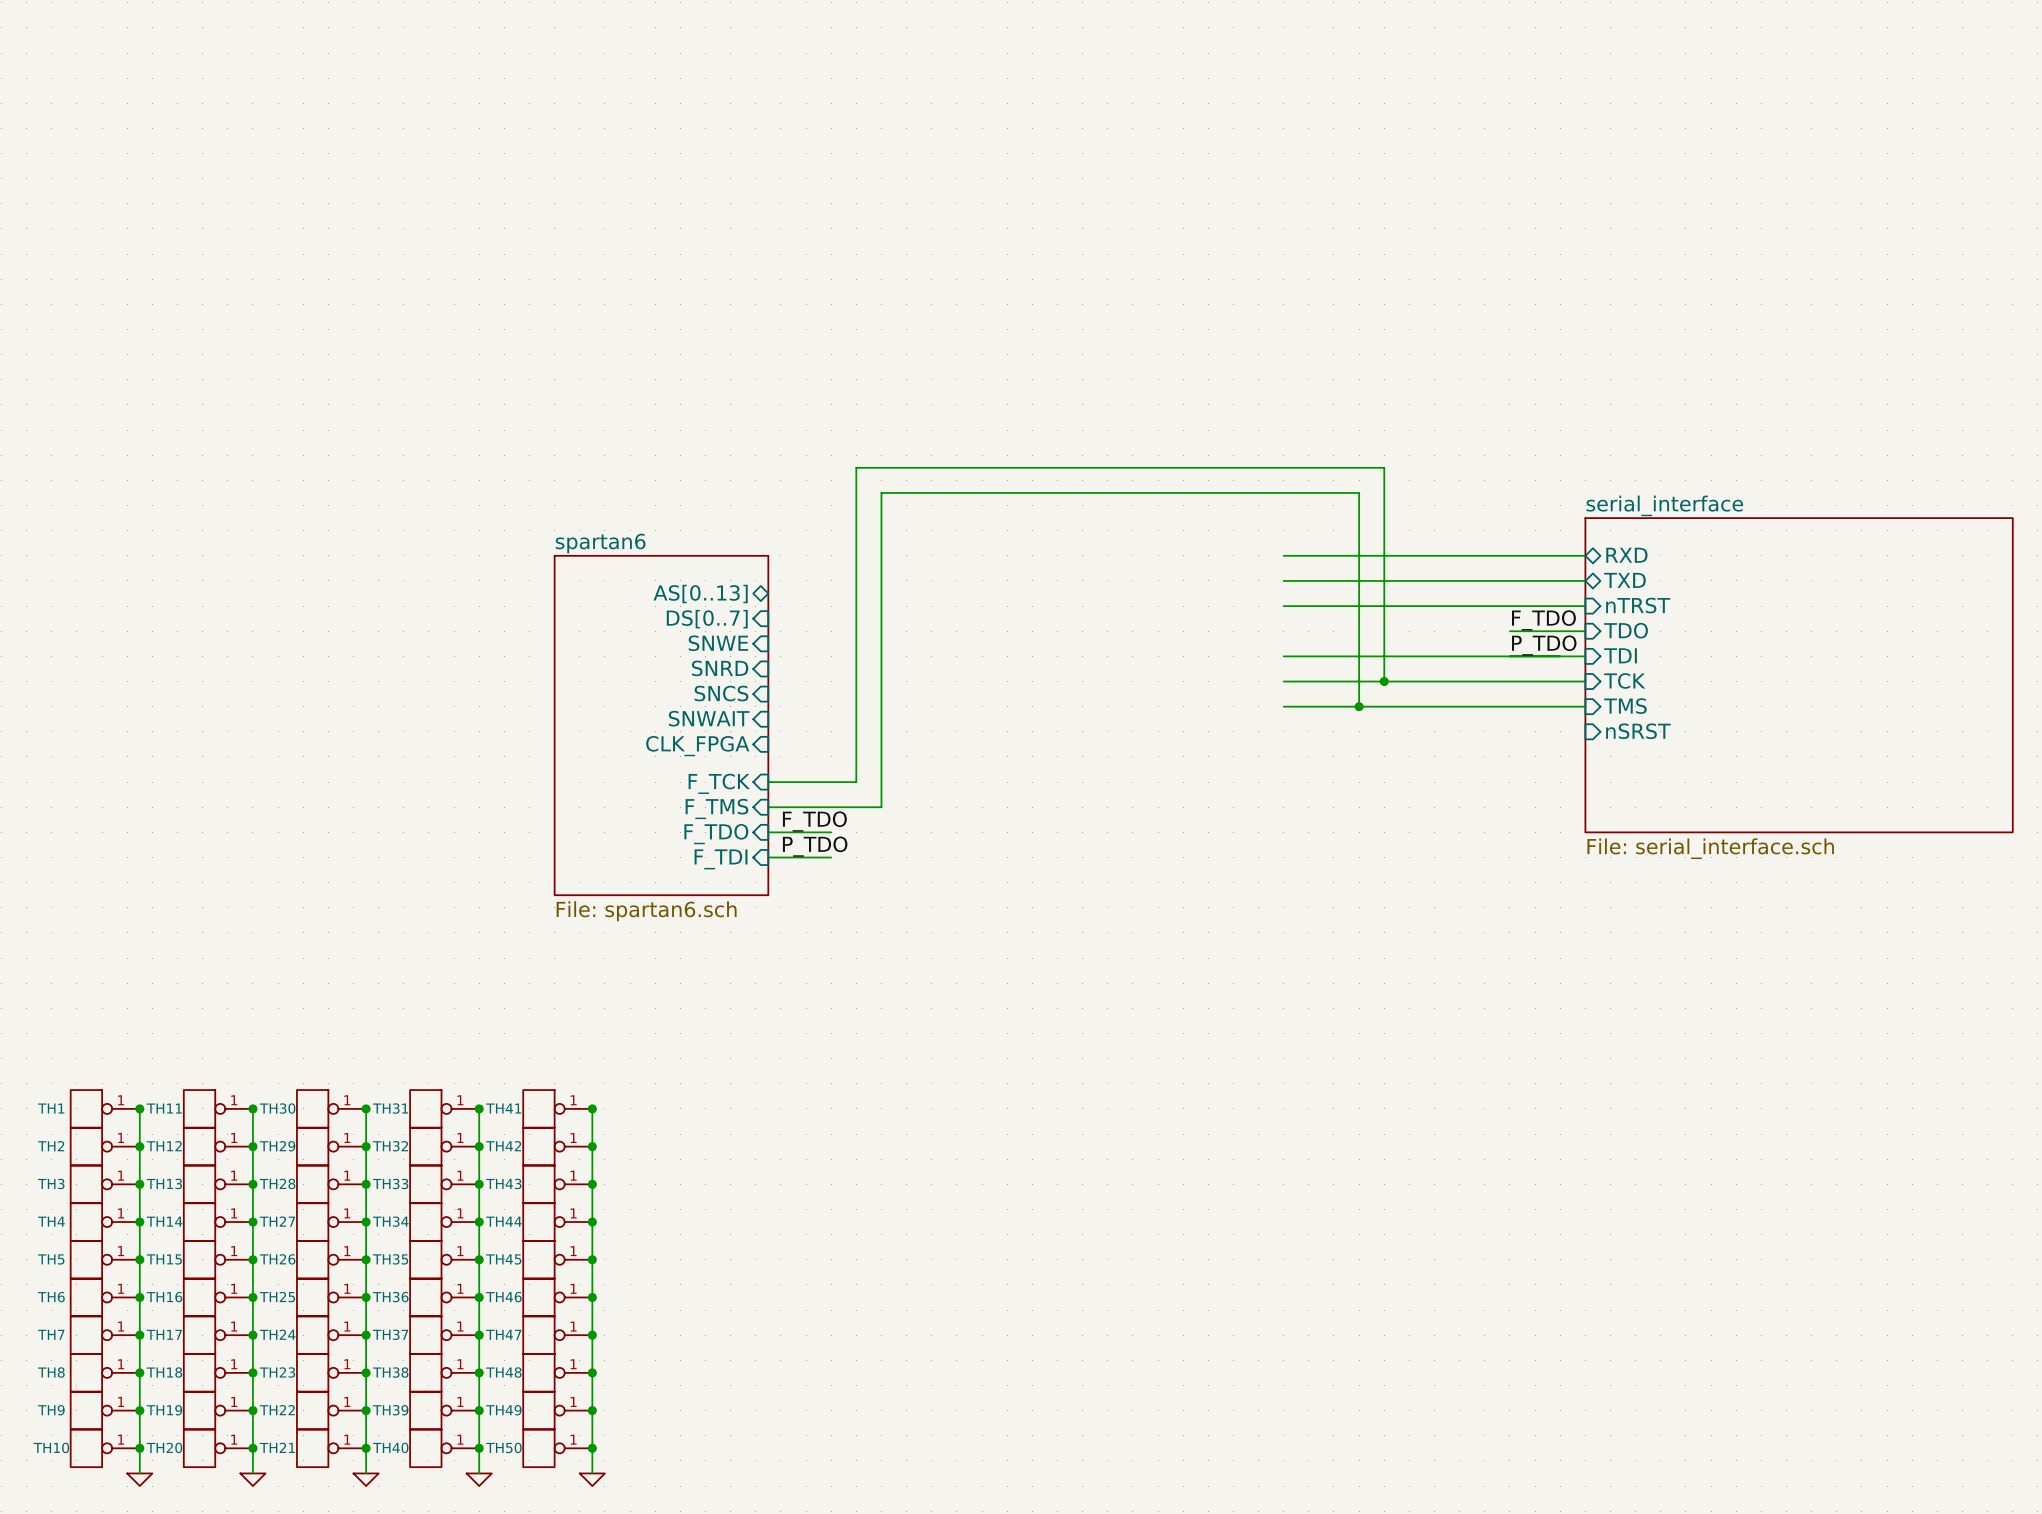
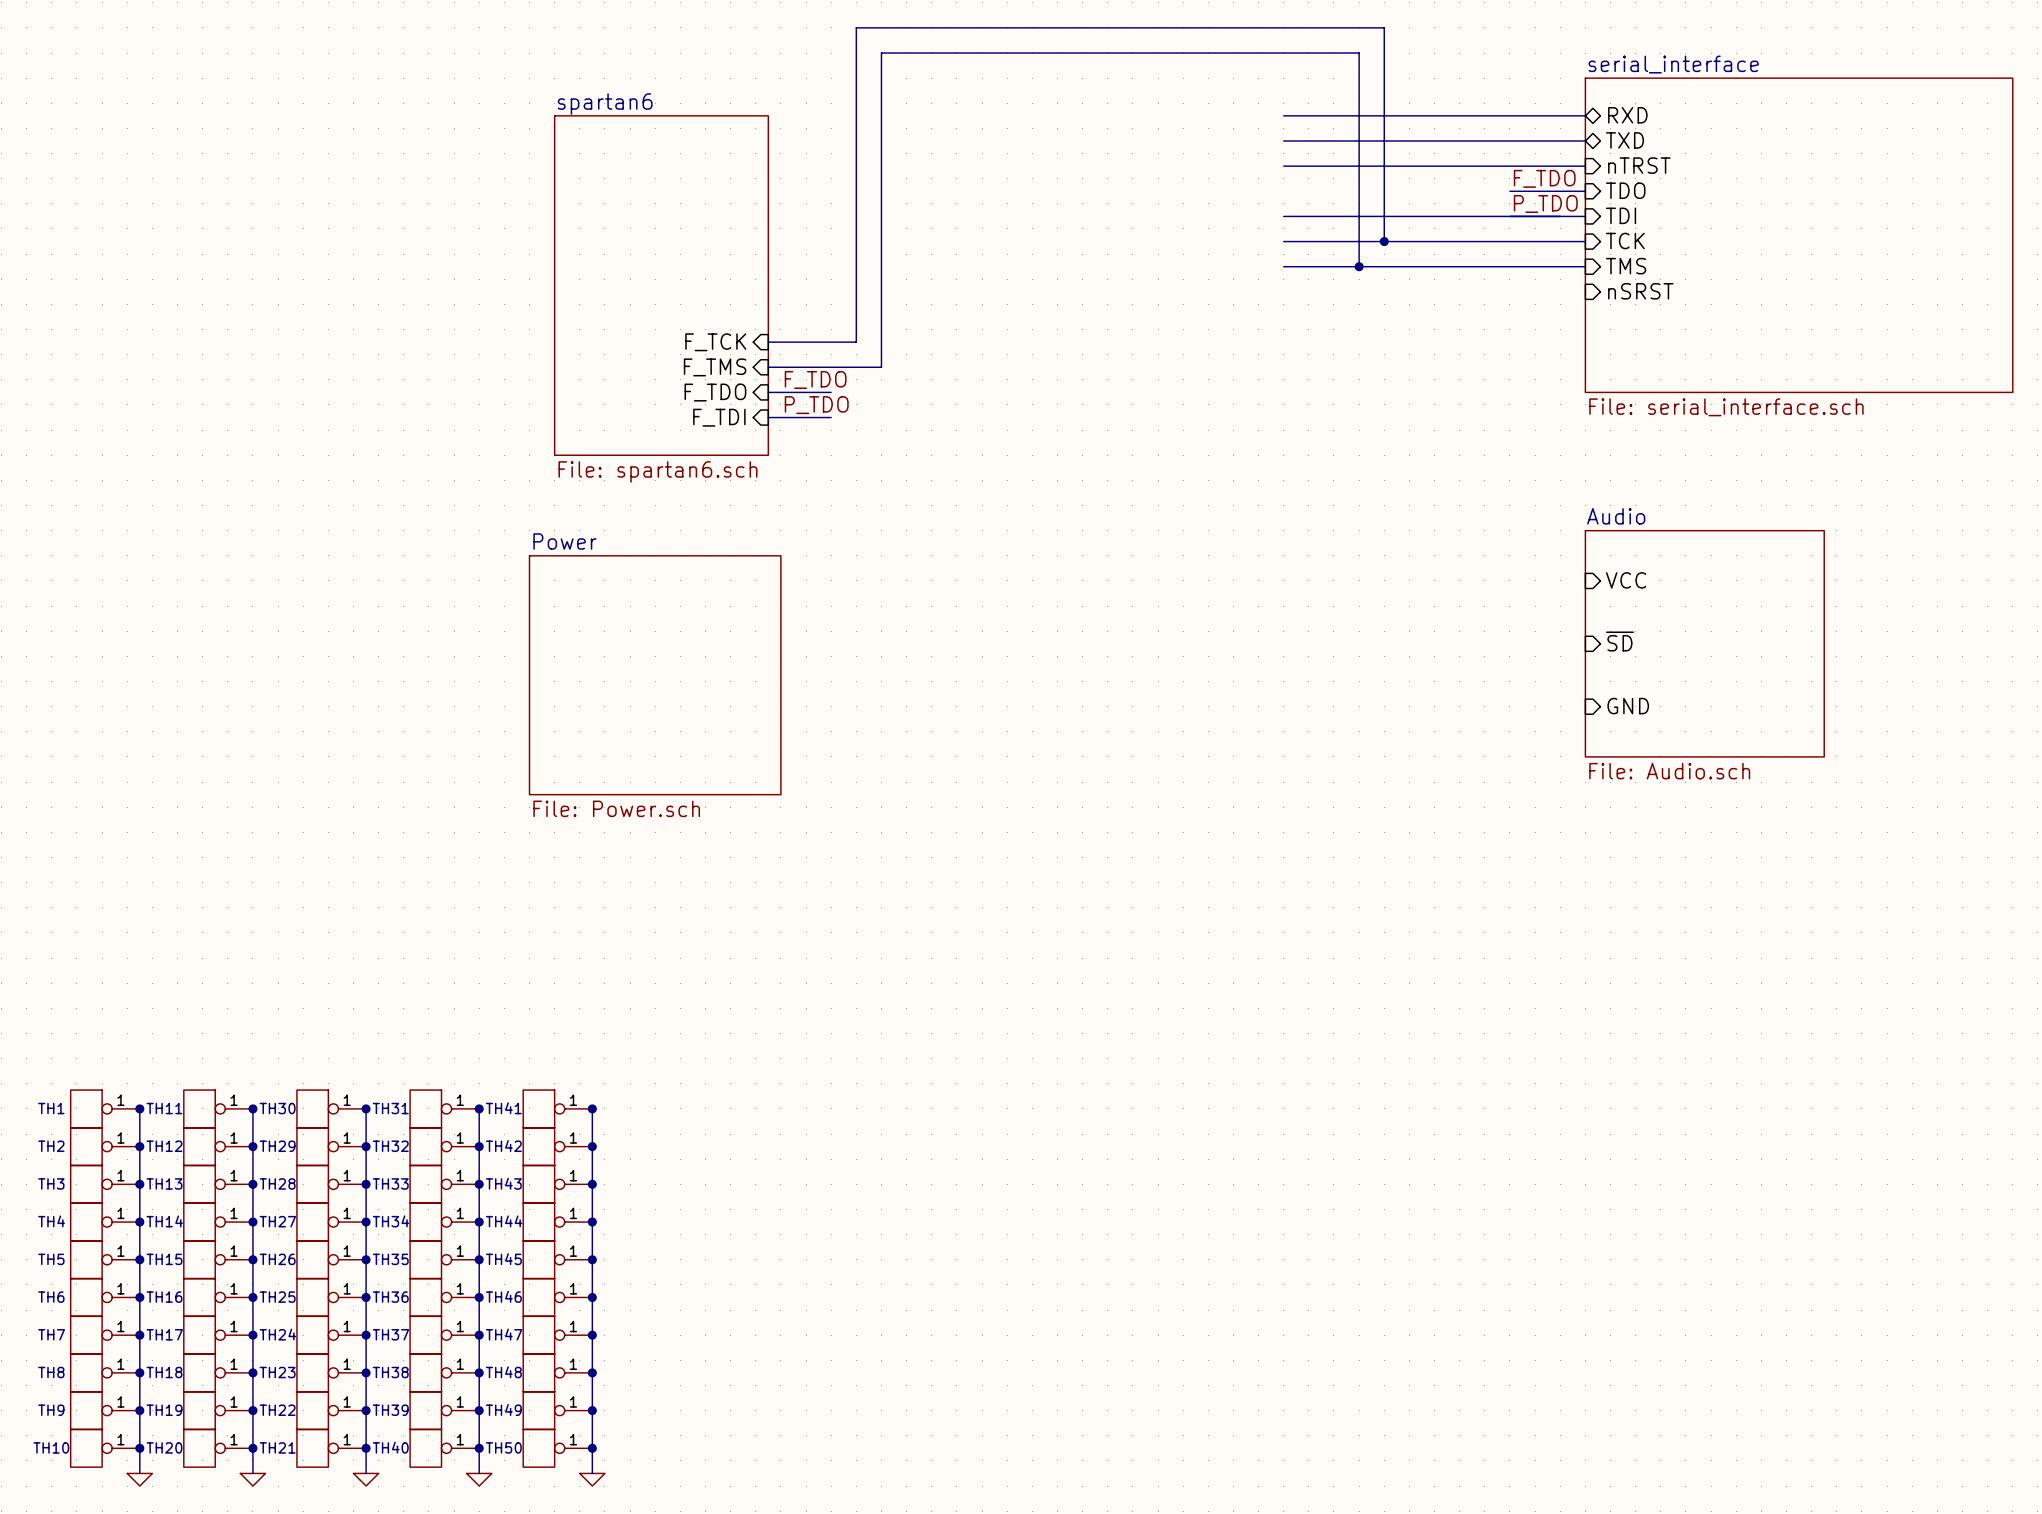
wire: none -> (1283, 115) (1585, 115)
sheet pin: none -> RXD (1627, 115)
sheet pin: none -> TXD (1624, 140)
wire: none -> (1283, 141) (1585, 141)
sheet pin: none -> nTRST (1639, 165)
wire: none -> (1283, 166) (1585, 166)
label: none -> F_TDO (1544, 178)
sheet pin: none -> TDO (1625, 190)
wire: none -> (1509, 191) (1585, 191)
label: none -> P_TDO (1545, 203)
sheet pin: none -> TDI (1621, 215)
wire: none -> (1283, 216) (1585, 216)
sheet serial_interface: none -> File: serial_interface.sch (1799, 235)
wire: none -> (1283, 241) (1585, 241)
wire: none -> (1384, 241) (1384, 27) (856, 27) (856, 342) (768, 342)
junction: none -> (1384, 241)
sheet pin: none -> TCK (1625, 241)
wire: none -> (1283, 266) (1585, 266)
wire: none -> (1359, 266) (1359, 53) (881, 53) (881, 367) (768, 367)
junction: none -> (1359, 266)
sheet pin: none -> TMS (1626, 266)
sheet pin: none -> nSRST (1640, 291)
sheet pin: none -> F_TCK (715, 342)
sheet pin: none -> F_TMS (715, 367)
label: none -> F_TDO (815, 379)
wire: none -> (768, 392) (831, 392)
sheet pin: none -> F_TDO (715, 392)
label: none -> P_TDO (816, 405)
wire: none -> (768, 417) (831, 417)
sheet pin: none -> F_TDI (719, 417)
wire: (1283, 555) (1585, 555) -> none
sheet pin: RXD (1626, 555) -> none
wire: (1283, 580) (1585, 580) -> none
sheet pin shape: bidirectional (1624, 580) -> input (1626, 580)
sheet pin: TXD (1624, 580) -> VCC (1626, 580)
sheet pin: AS[0..13] (700, 594) -> none
sheet pin: nTRST (1638, 605) -> none
wire: (1283, 606) (1585, 606) -> none
sheet pin: DS[0..7] (707, 619) -> none
label: F_TDO (1543, 620) -> none
sheet pin: TDO (1626, 630) -> none
wire: (1509, 631) (1585, 631) -> none
sheet pin: none -> ~{SD} (1619, 641)
sheet pin: SNWE (718, 643) -> none
sheet Audio: none -> File: Audio.sch (1704, 643)
label: P_TDO (1544, 645) -> none
sheet pin: TDI (1620, 655) -> none
wire: (1283, 656) (1585, 656) -> none
sheet pin: SNRD (720, 668) -> none
sheet Power: none -> File: Power.sch (655, 675)
sheet serial_interface: File: serial_interface.sch (1799, 675) -> none
sheet pin: TCK (1624, 680) -> none
wire: (1283, 681) (1585, 681) -> none
wire: (1384, 681) (1384, 467) (856, 467) (856, 782) (768, 782) -> none
junction: (1384, 681) -> none
sheet pin: SNCS (721, 693) -> none
wire: (1283, 706) (1585, 706) -> none
wire: (1359, 706) (1359, 492) (881, 492) (881, 807) (768, 807) -> none
junction: (1359, 706) -> none
sheet pin: TMS (1625, 706) -> GND (1628, 706)
sheet pin: SNWAIT (709, 718) -> none
sheet spartan6 position: (661, 725) -> (661, 285)
sheet pin: nSRST (1638, 731) -> none
sheet pin: CLK_FPGA (697, 746) -> none
sheet pin: F_TCK (719, 783) -> none
sheet pin: F_TMS (716, 808) -> none
label: F_TDO (814, 821) -> none
wire: (768, 832) (831, 832) -> none
sheet pin: F_TDO (716, 834) -> none
label: P_TDO (815, 846) -> none
wire: (768, 857) (831, 857) -> none
sheet pin: F_TDI (721, 859) -> none

